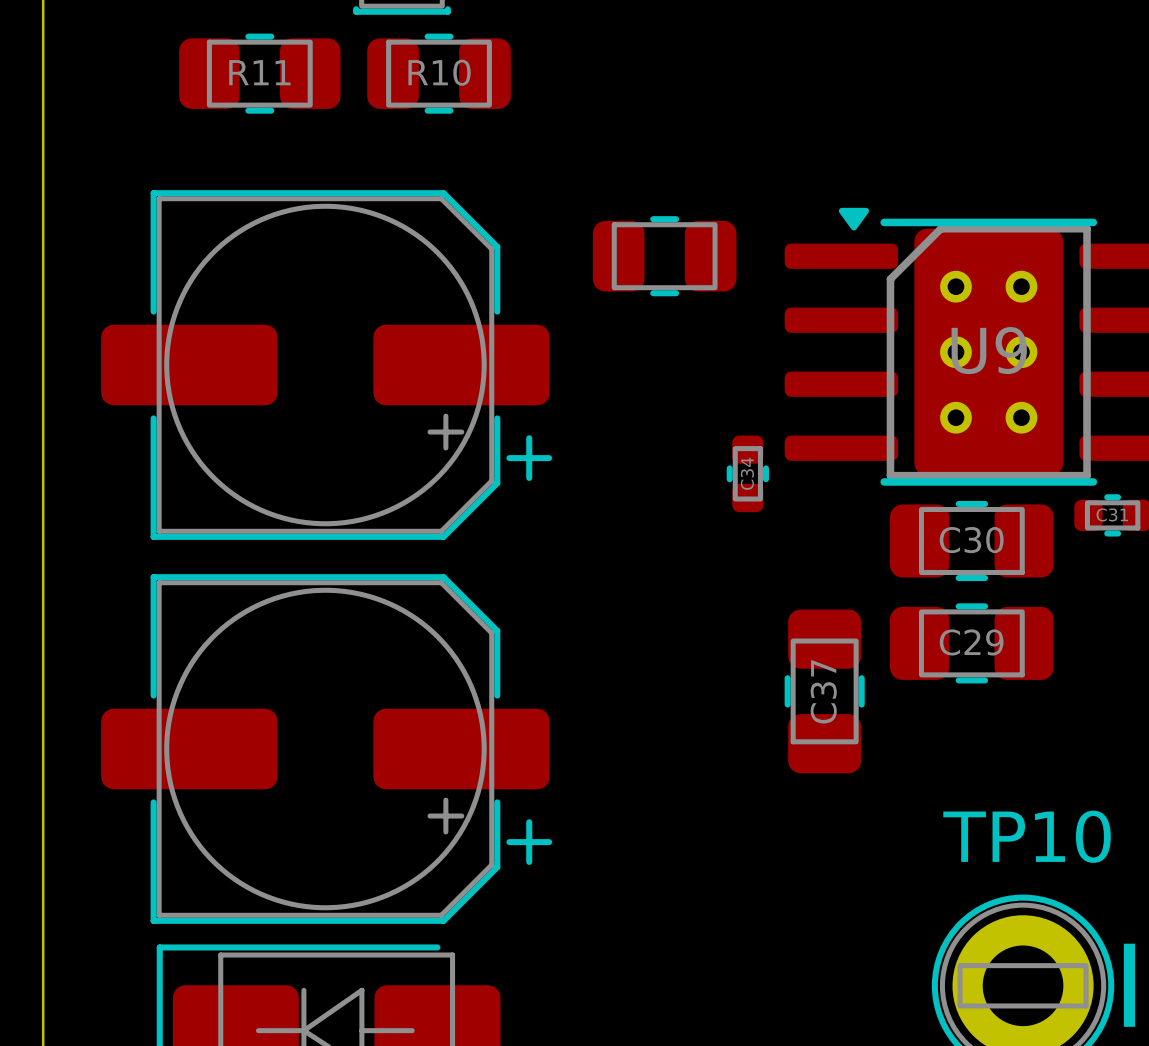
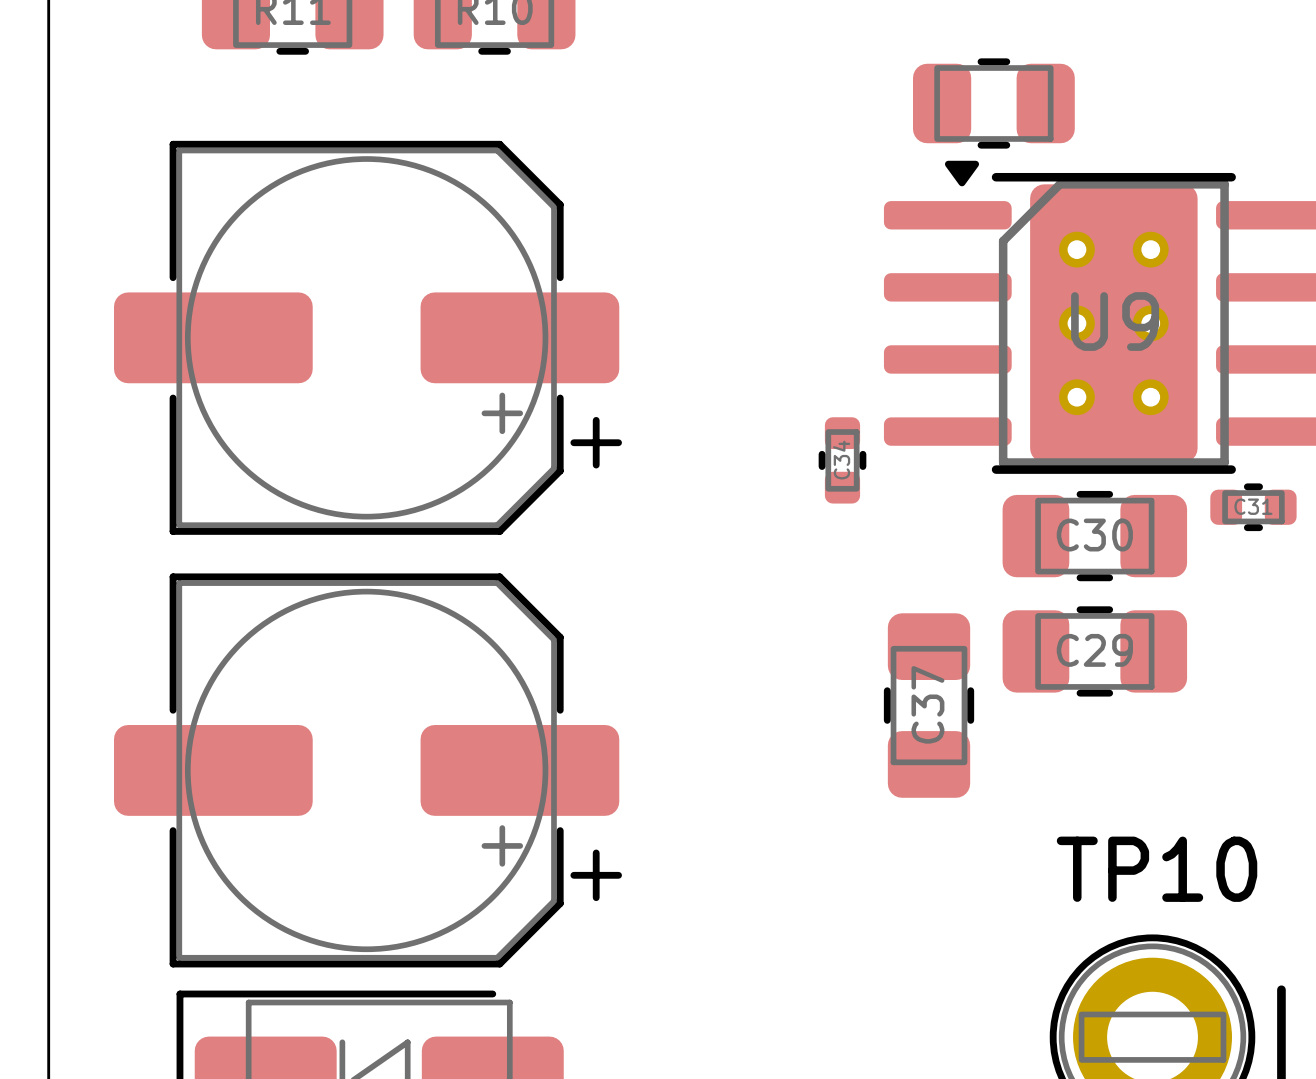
part position: (664, 256) -> (993, 103)

